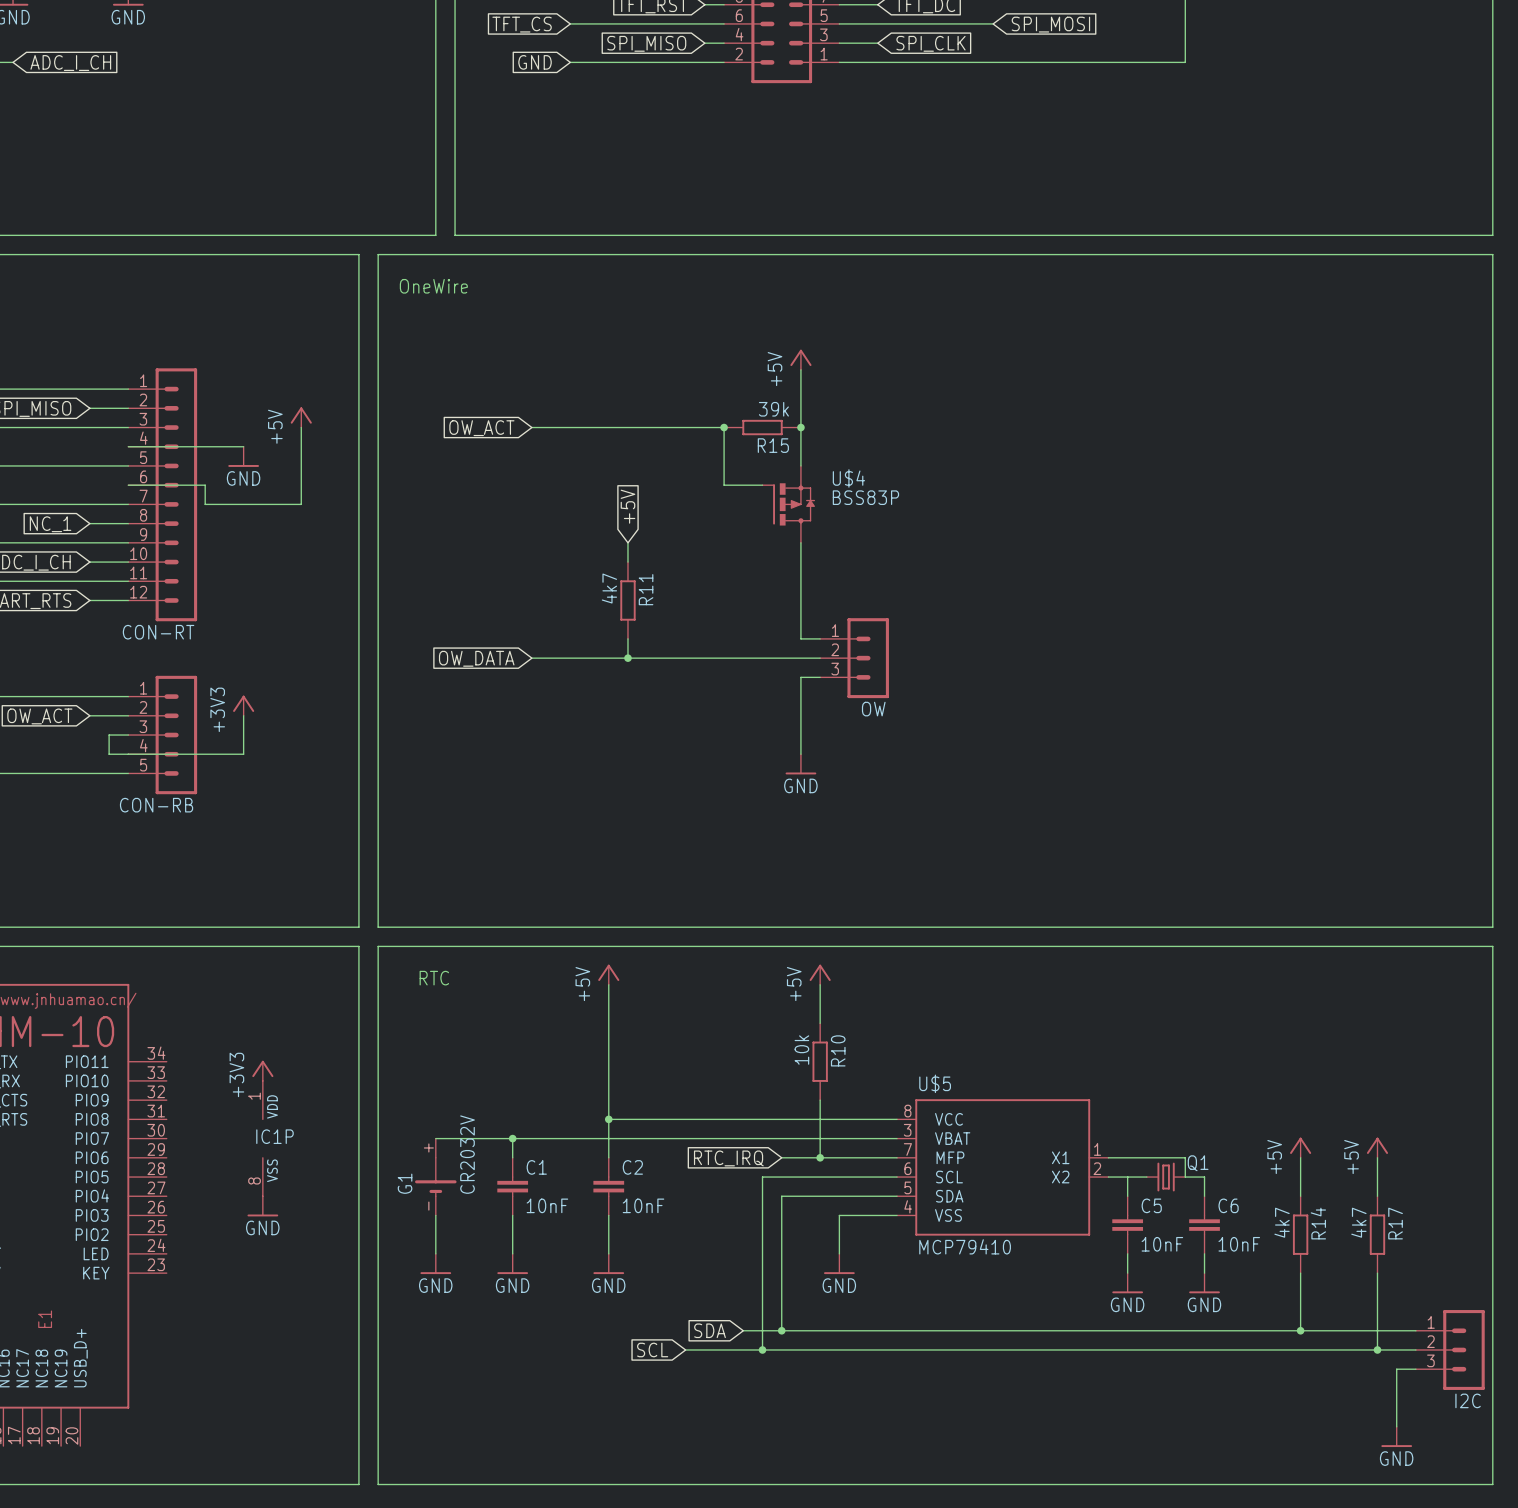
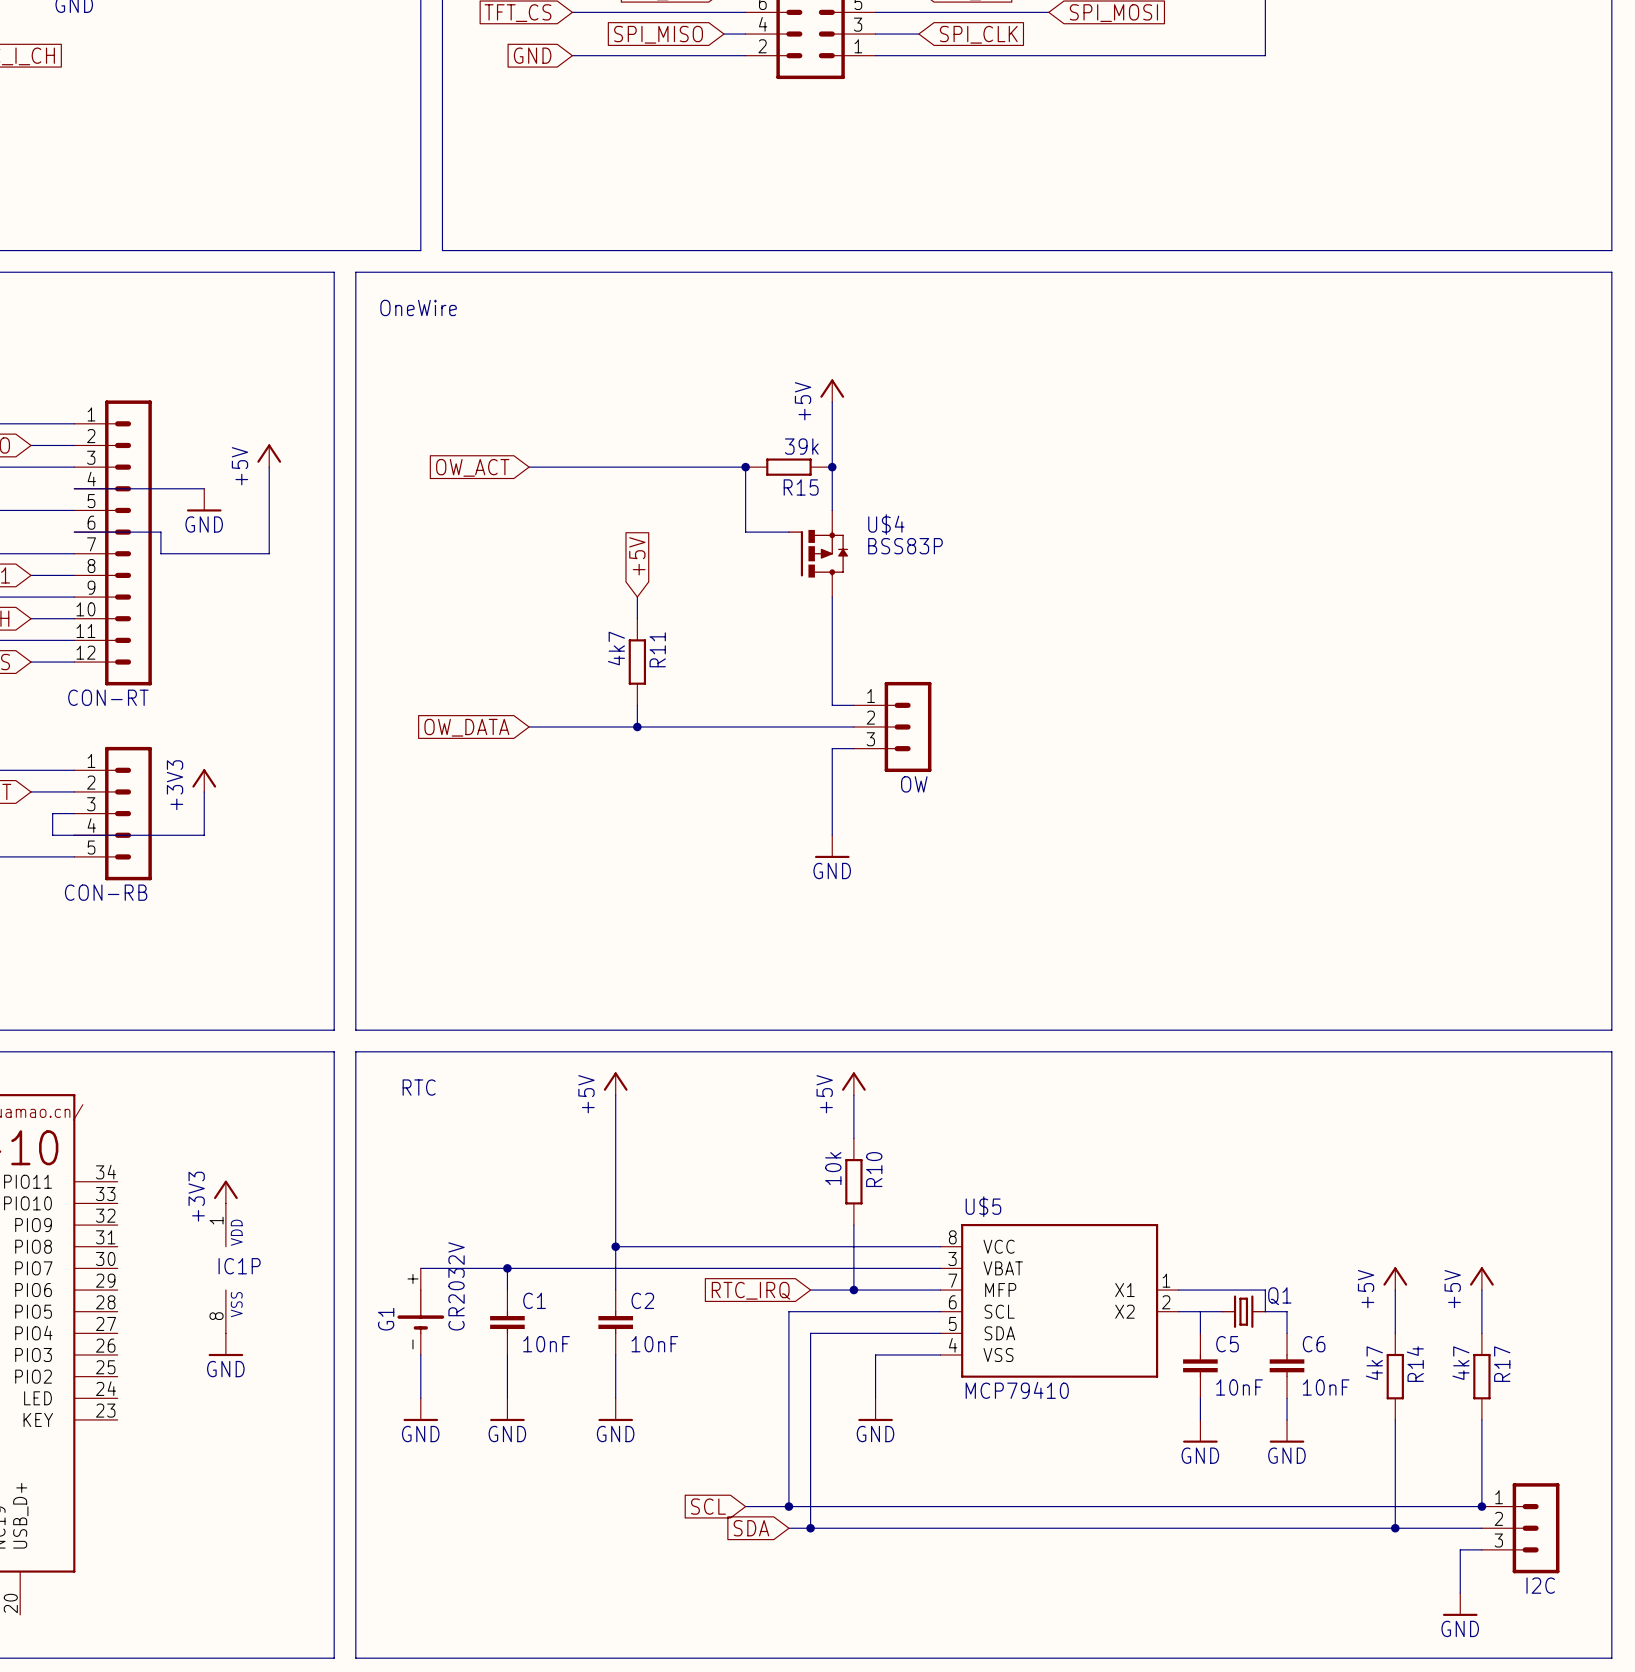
global label position: SDA (710, 1330) -> SDA (751, 1528)
wire: (743, 1330) (1415, 1330) -> none
wire: none -> (810, 1484) (810, 1528)
junction position: (781, 1330) -> (810, 1528)
wire: none -> (1395, 1484) (1395, 1528)
junction position: (1300, 1330) -> (1395, 1528)
global label position: SCL (652, 1349) -> SCL (708, 1506)
wire: (685, 1349) (724, 1349) -> none
I2C position: (1450, 1349) -> (1520, 1528)
wire: none -> (788, 1528) (1481, 1528)
wire: (1415, 1369) (1396, 1369) (1396, 1426) -> none
wire: none -> (1481, 1549) (1460, 1549) (1460, 1593)
power symbol position: GND (1396, 1436) -> GND (1460, 1604)

